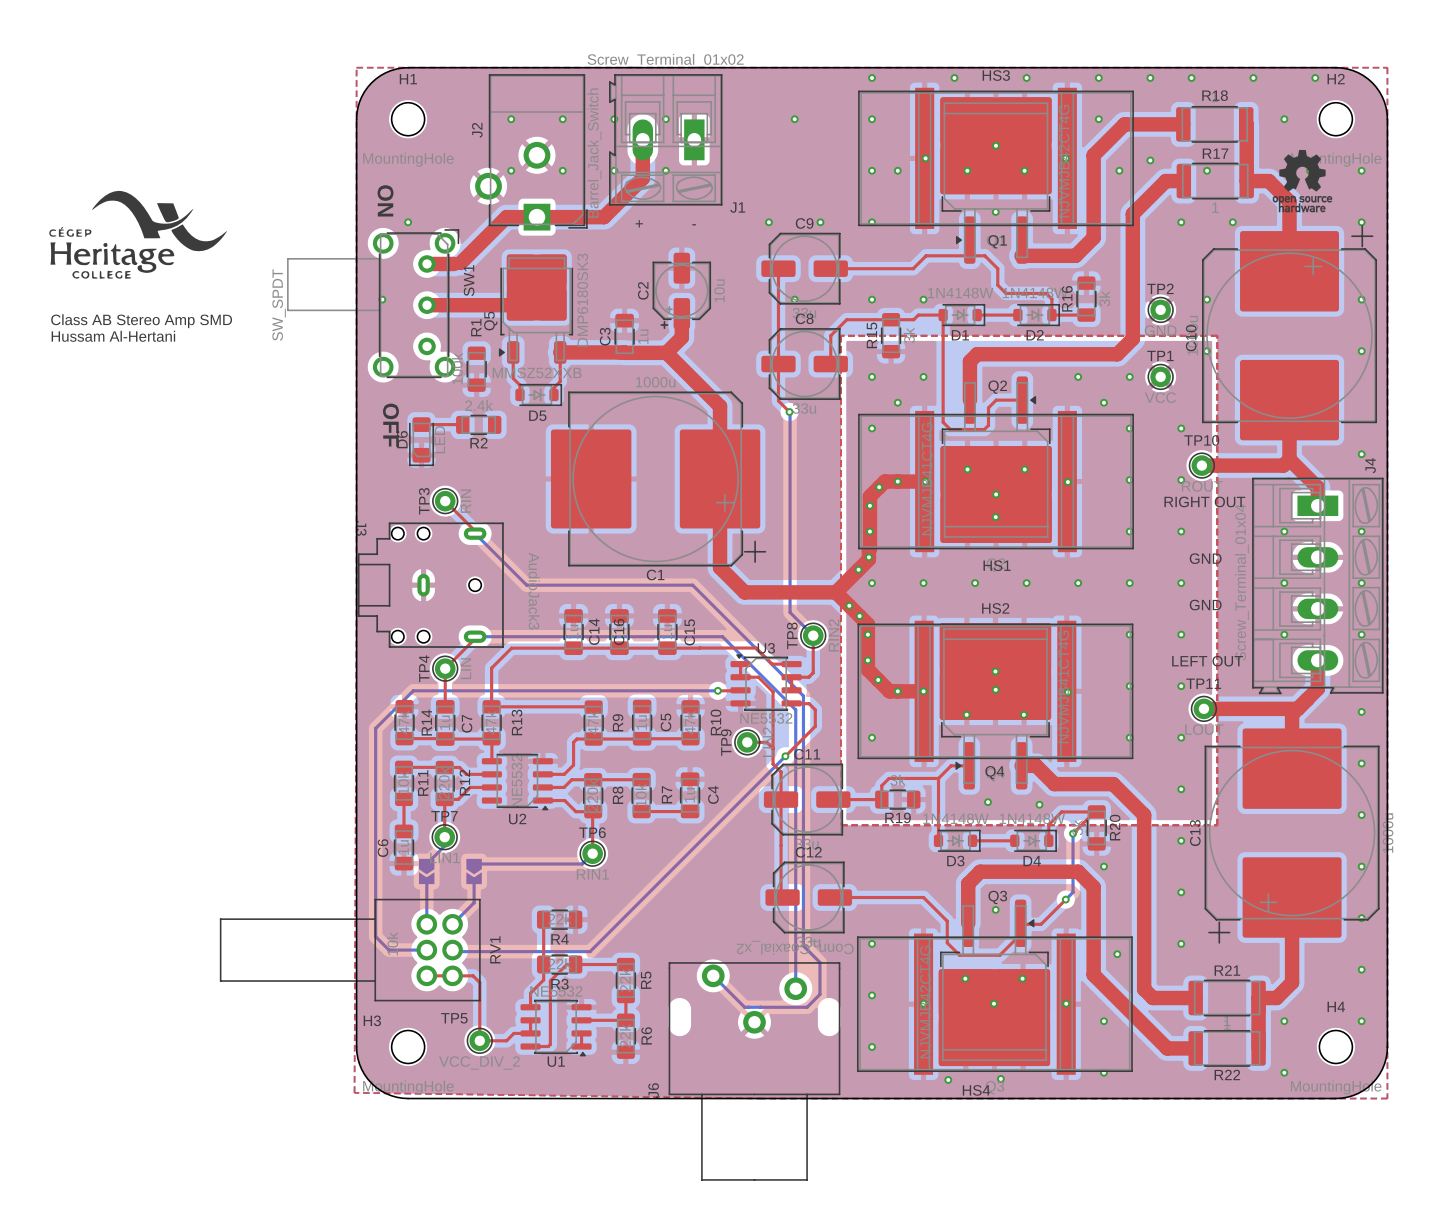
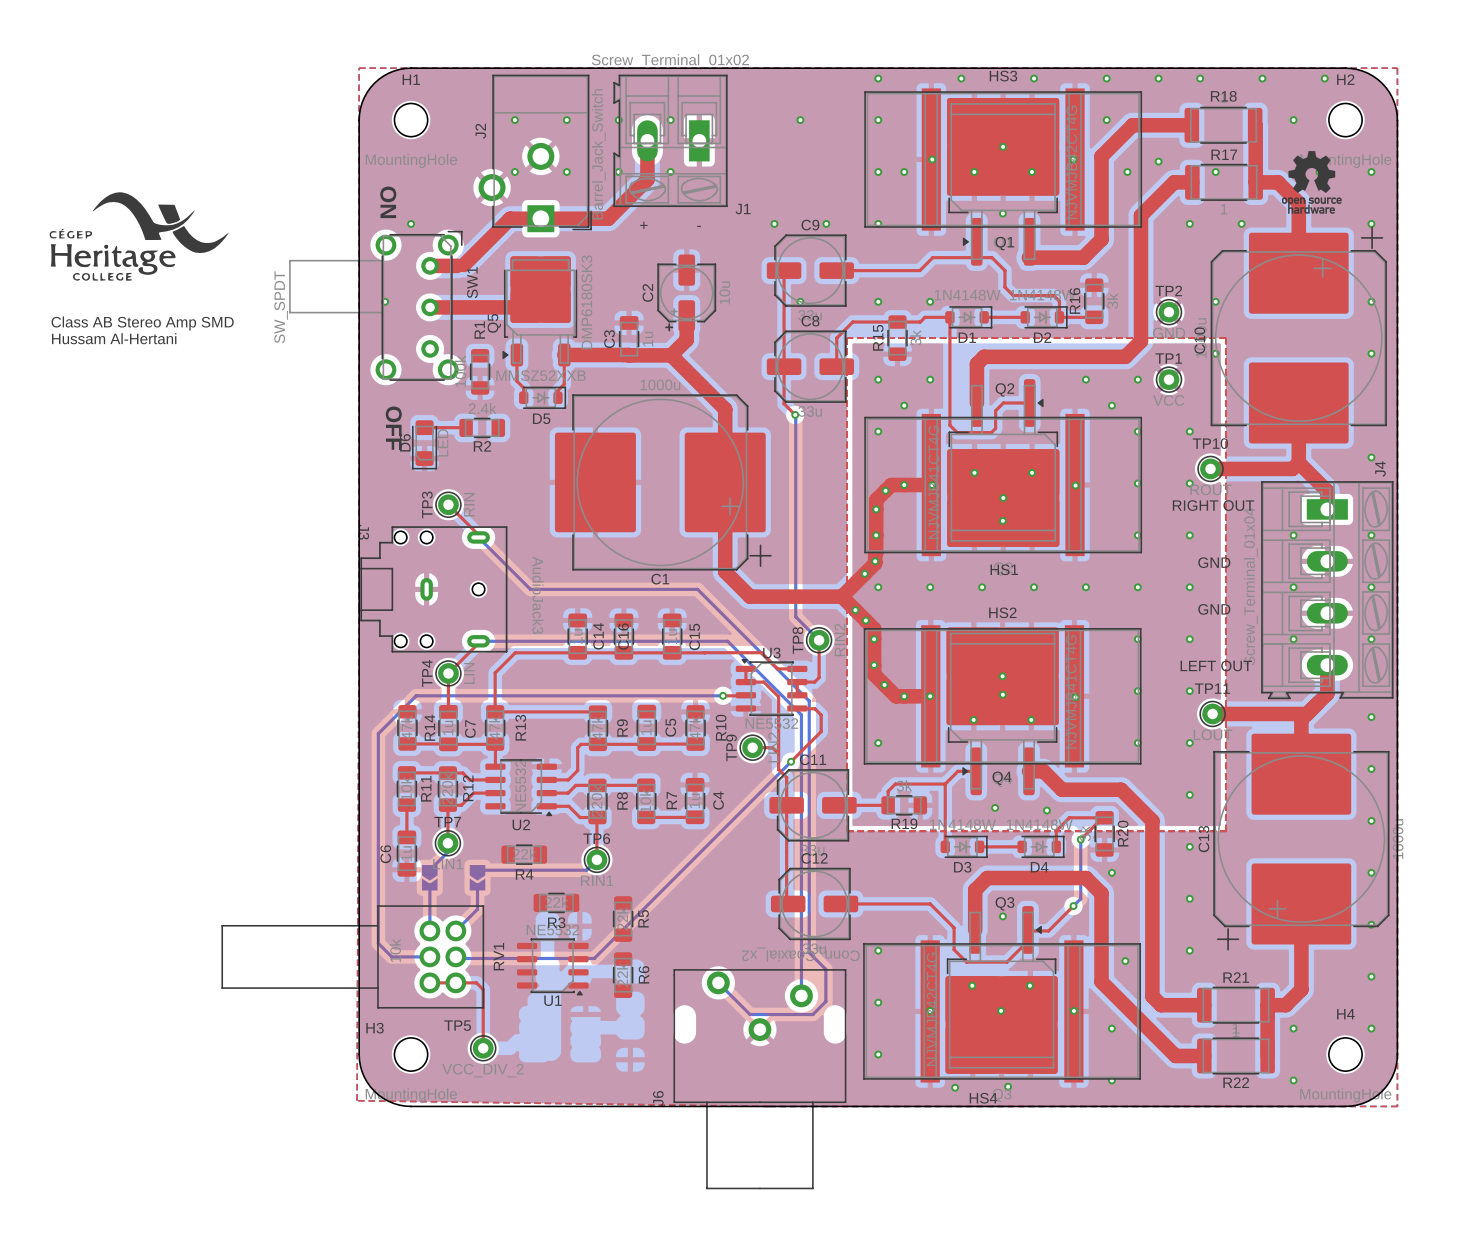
top track: (543, 919) (543, 979) (530, 993) (530, 1007) -> none
R4 position: (559, 919) -> (524, 854)
R3 position: (559, 964) -> (556, 902)
top track: (625, 964) (566, 964) (550, 981) (550, 1044) (548, 1046) (530, 1046) -> none
R5 position: (625, 980) -> (623, 919)
top track: (625, 996) (625, 1020) -> none
top track: (530, 1020) (530, 1033) (513, 1033) (506, 1040) (479, 1040) -> none
top track: (581, 1020) (625, 1020) -> none
U1 position: (556, 1028) -> (552, 966)
top track: (581, 1033) (581, 1046) -> none
R6 position: (625, 1036) -> (623, 975)

